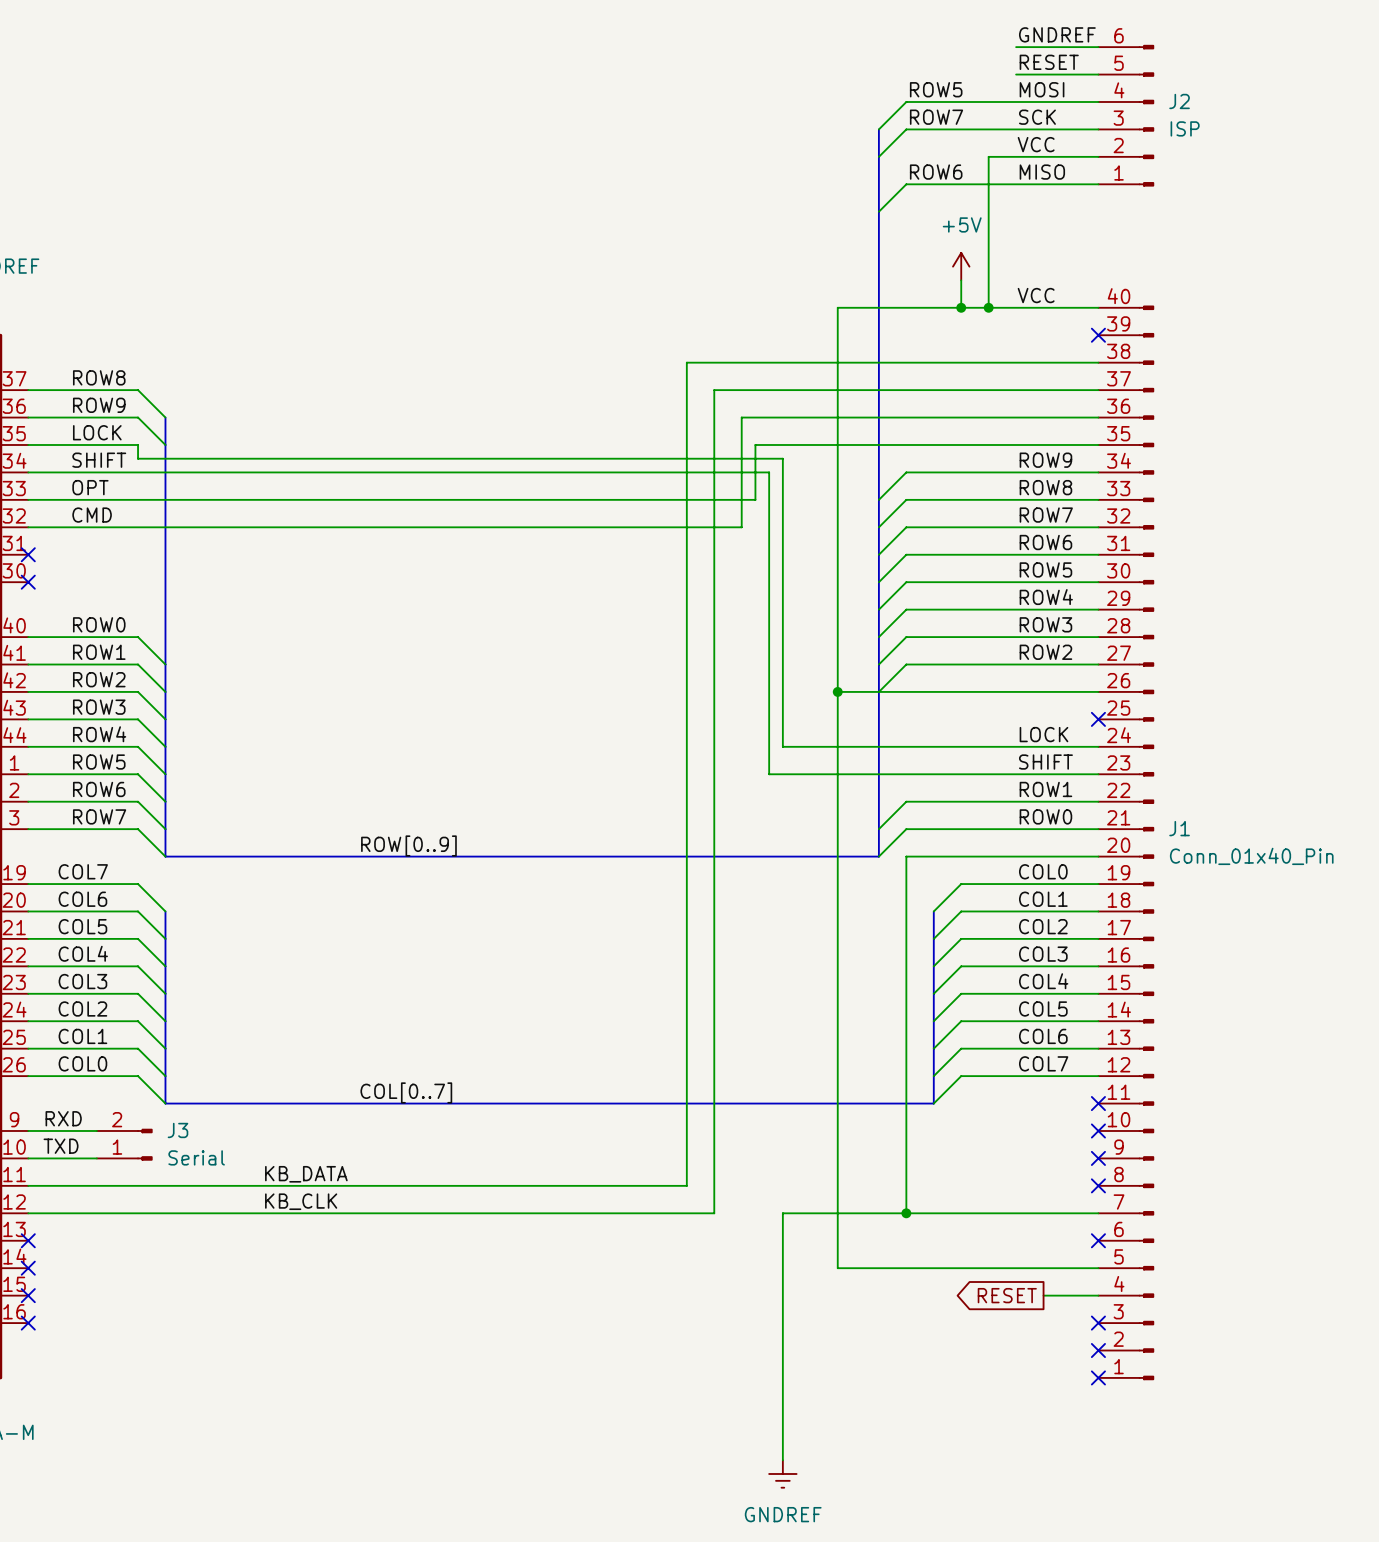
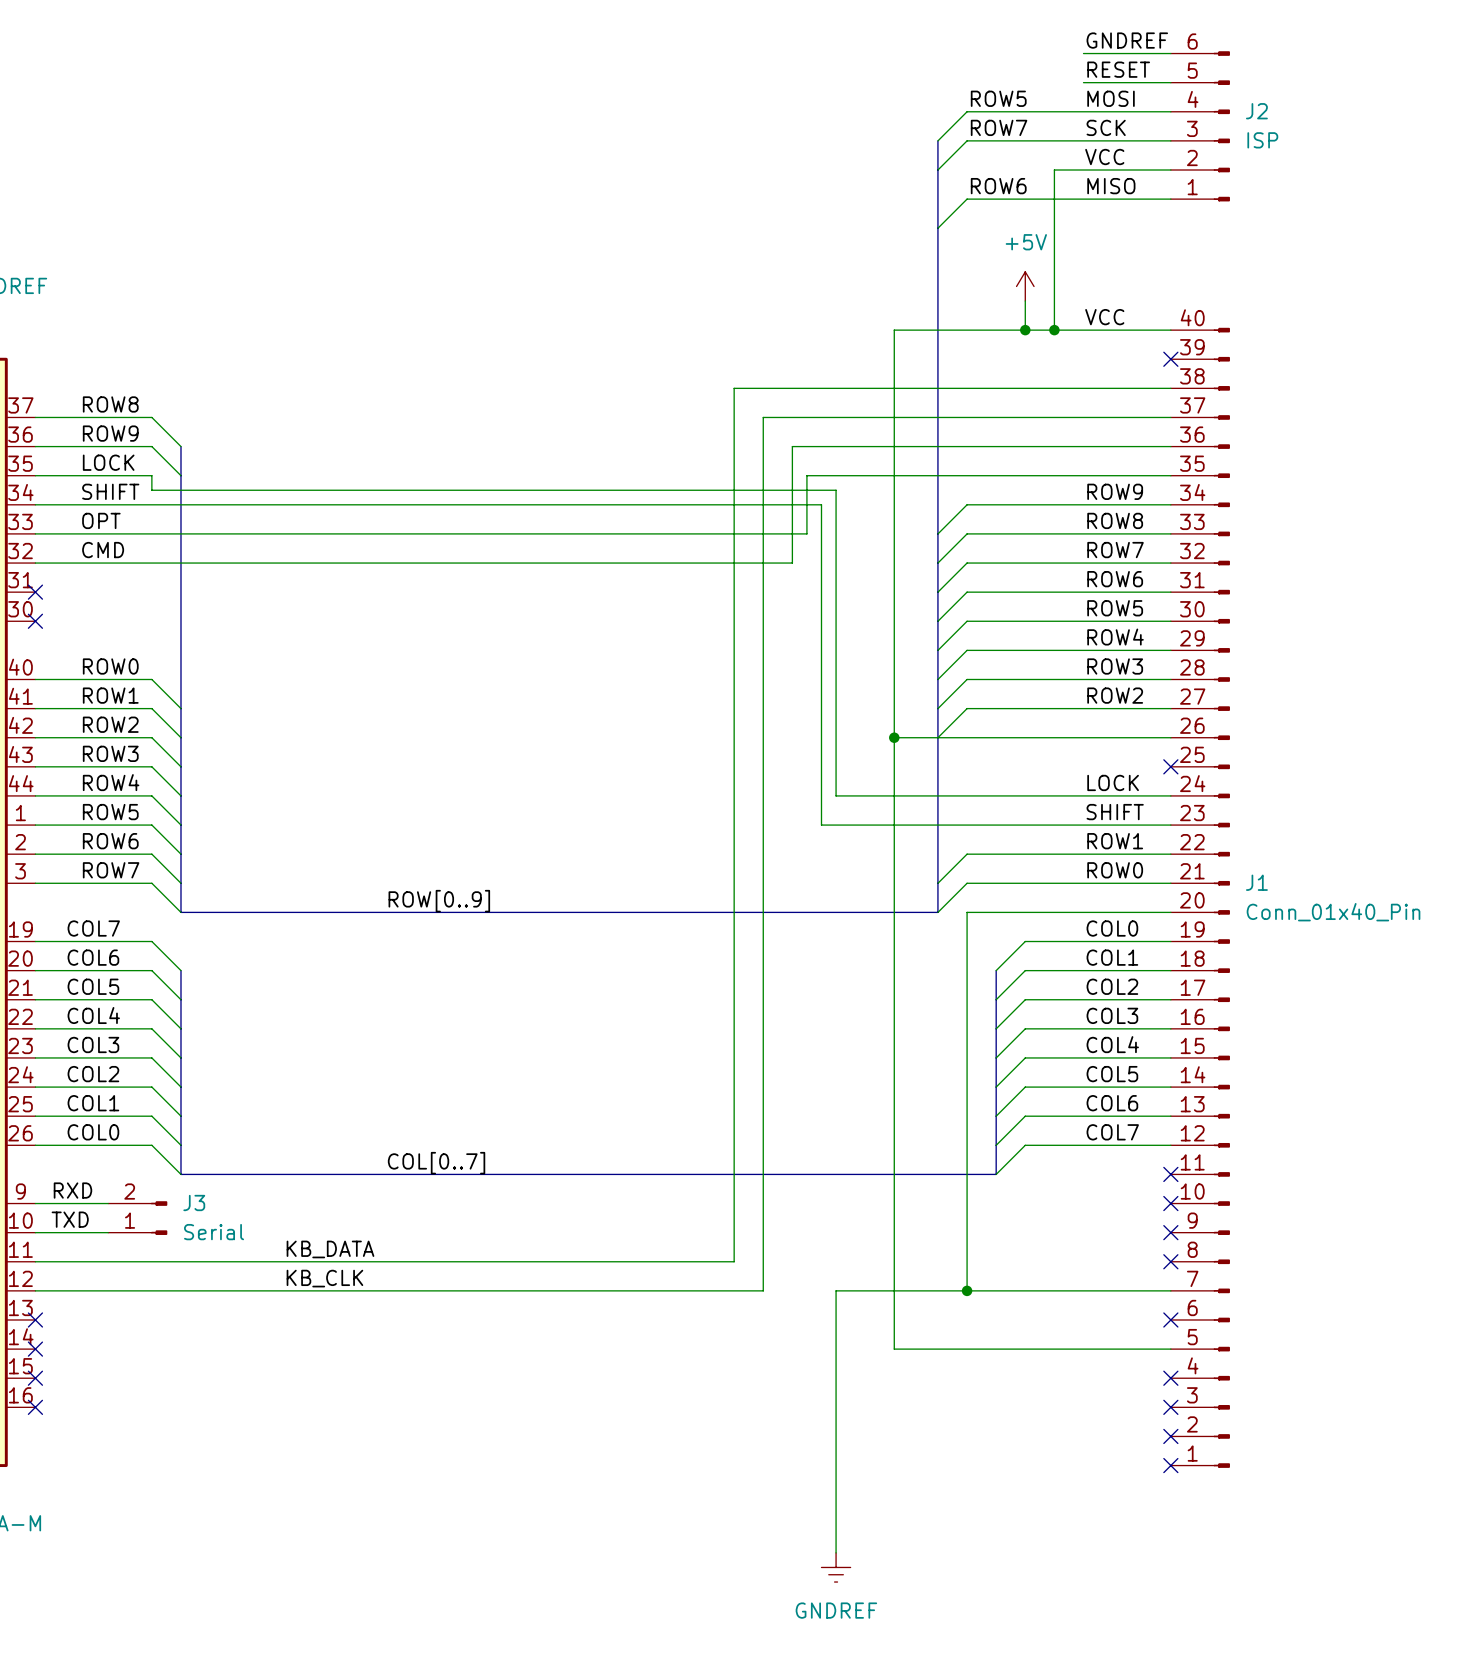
global label: RESET (1007, 1295) -> none
wire: (1043, 1295) (1098, 1295) -> none
no-connect mark: none -> (1170, 1378)

